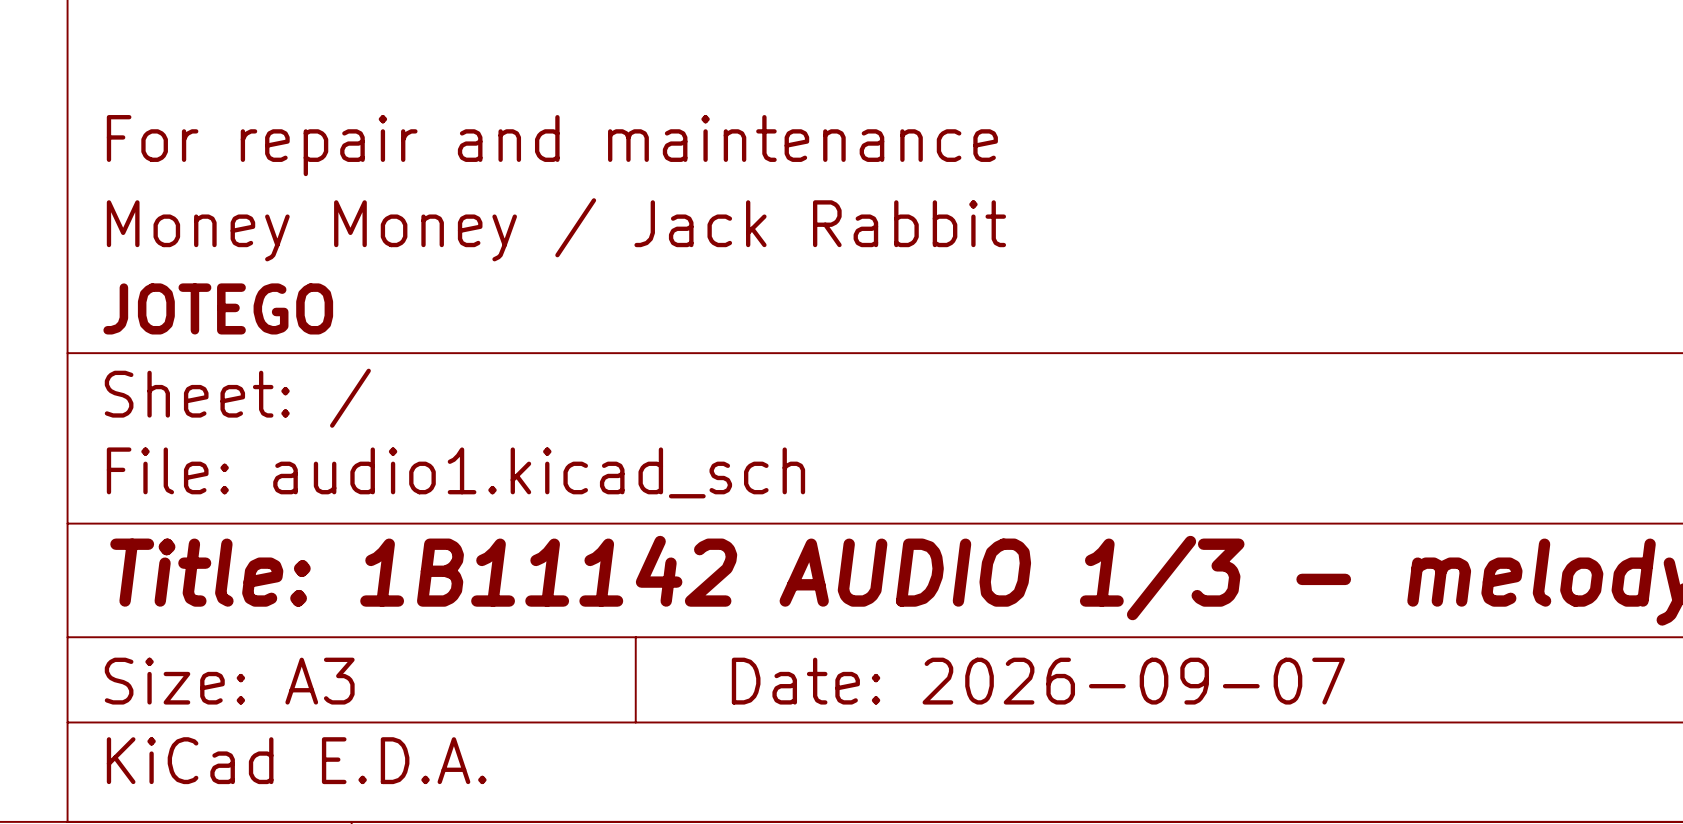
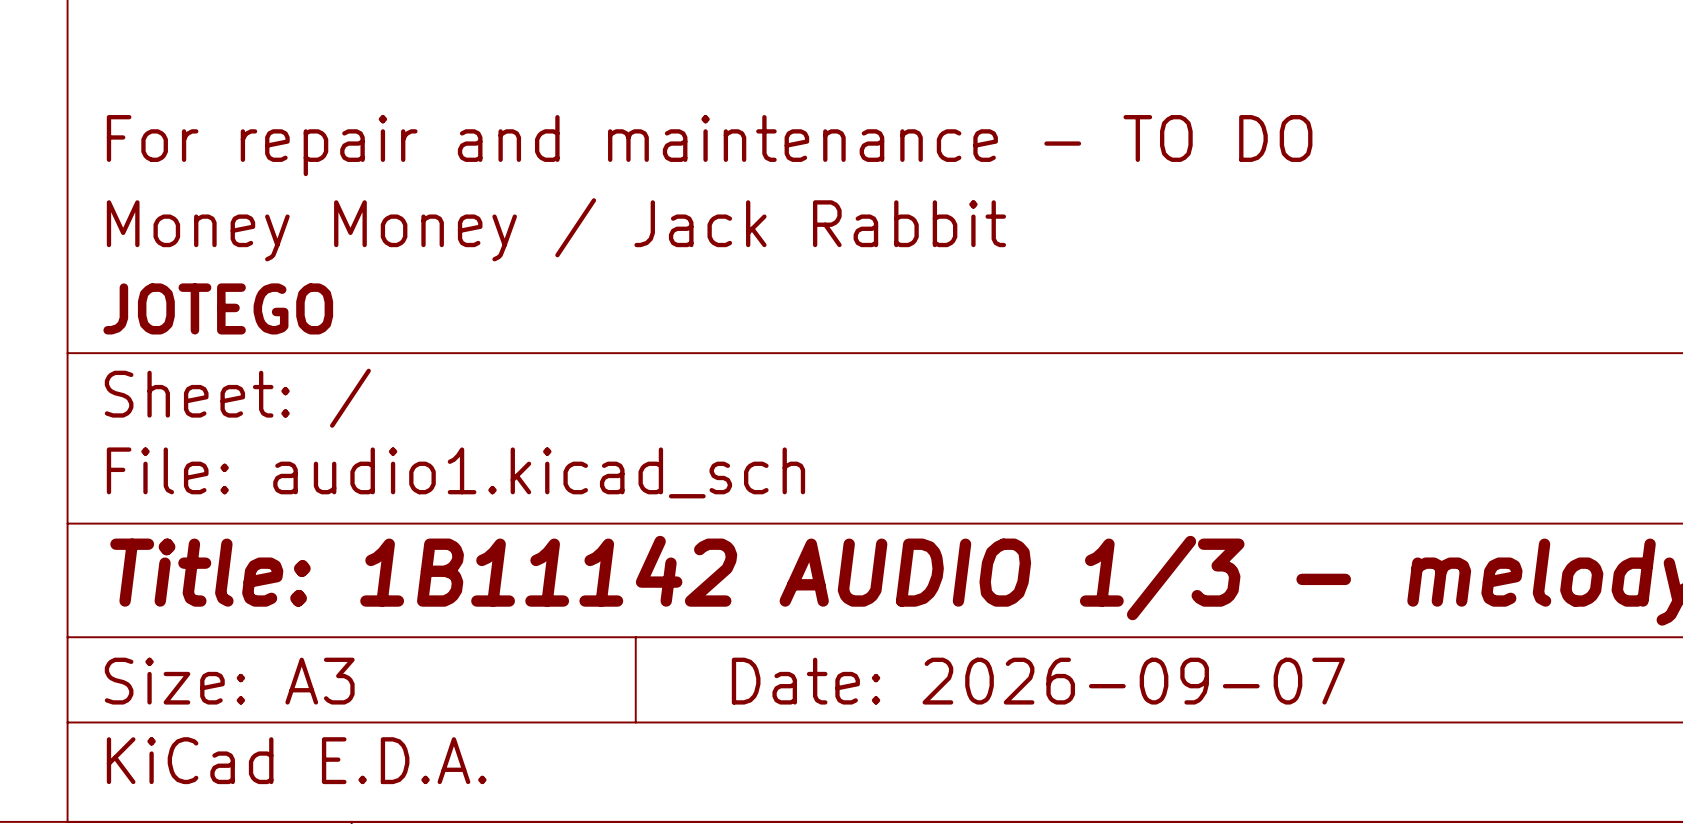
title block: For repair and maintenance (552, 145) -> For repair and maintenance - TO DO (709, 145)

